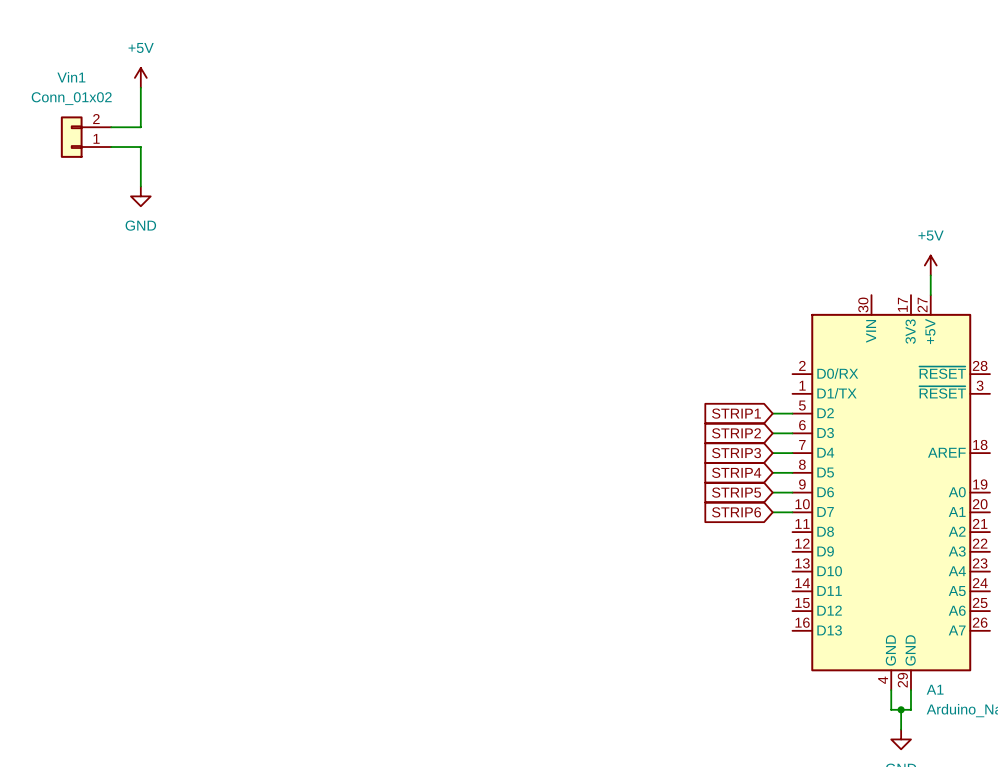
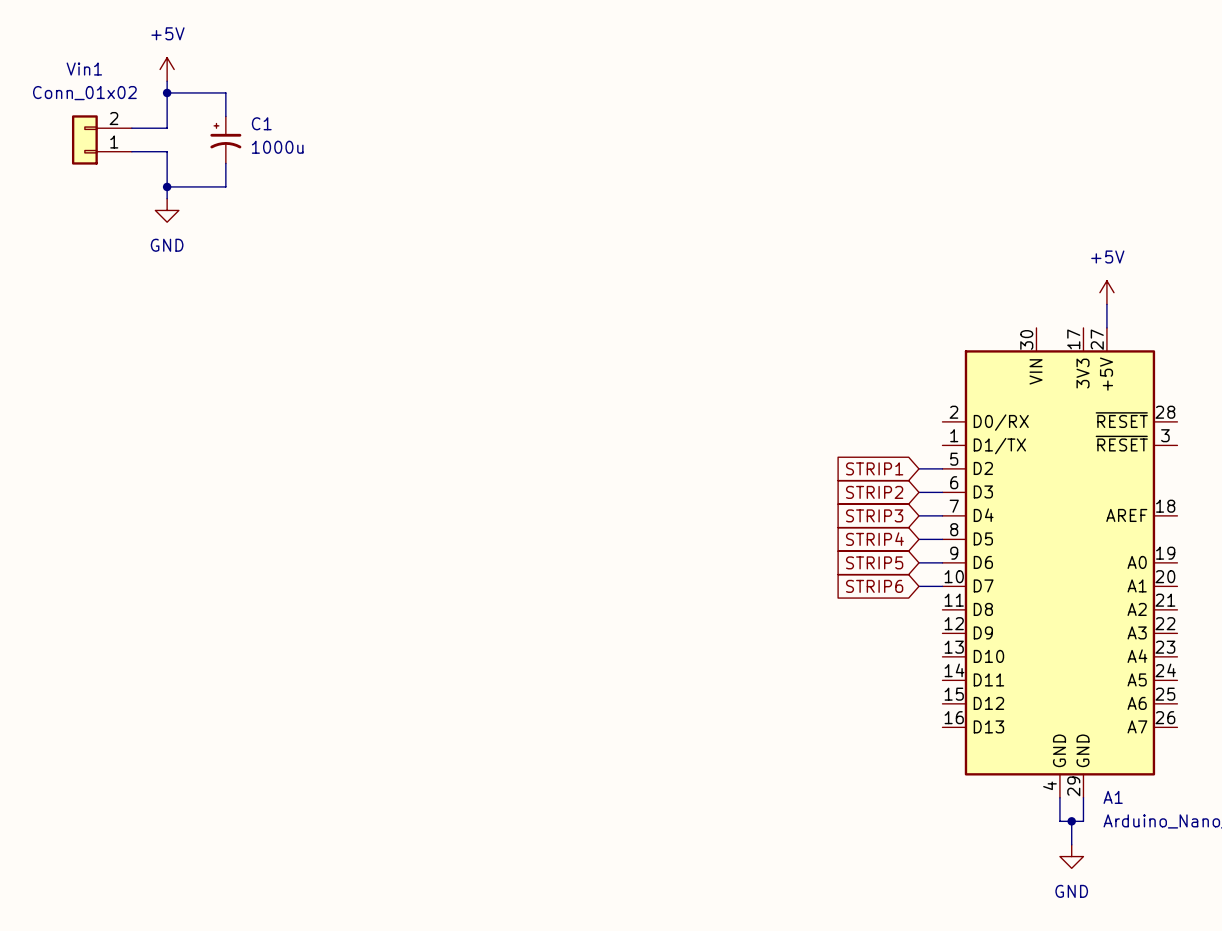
wire: none -> (167, 92) (225, 92) (225, 116)
junction: none -> (167, 92)
C1: none -> 1000u (225, 139)
wire: none -> (225, 163) (225, 186) (167, 186)
junction: none -> (167, 186)

